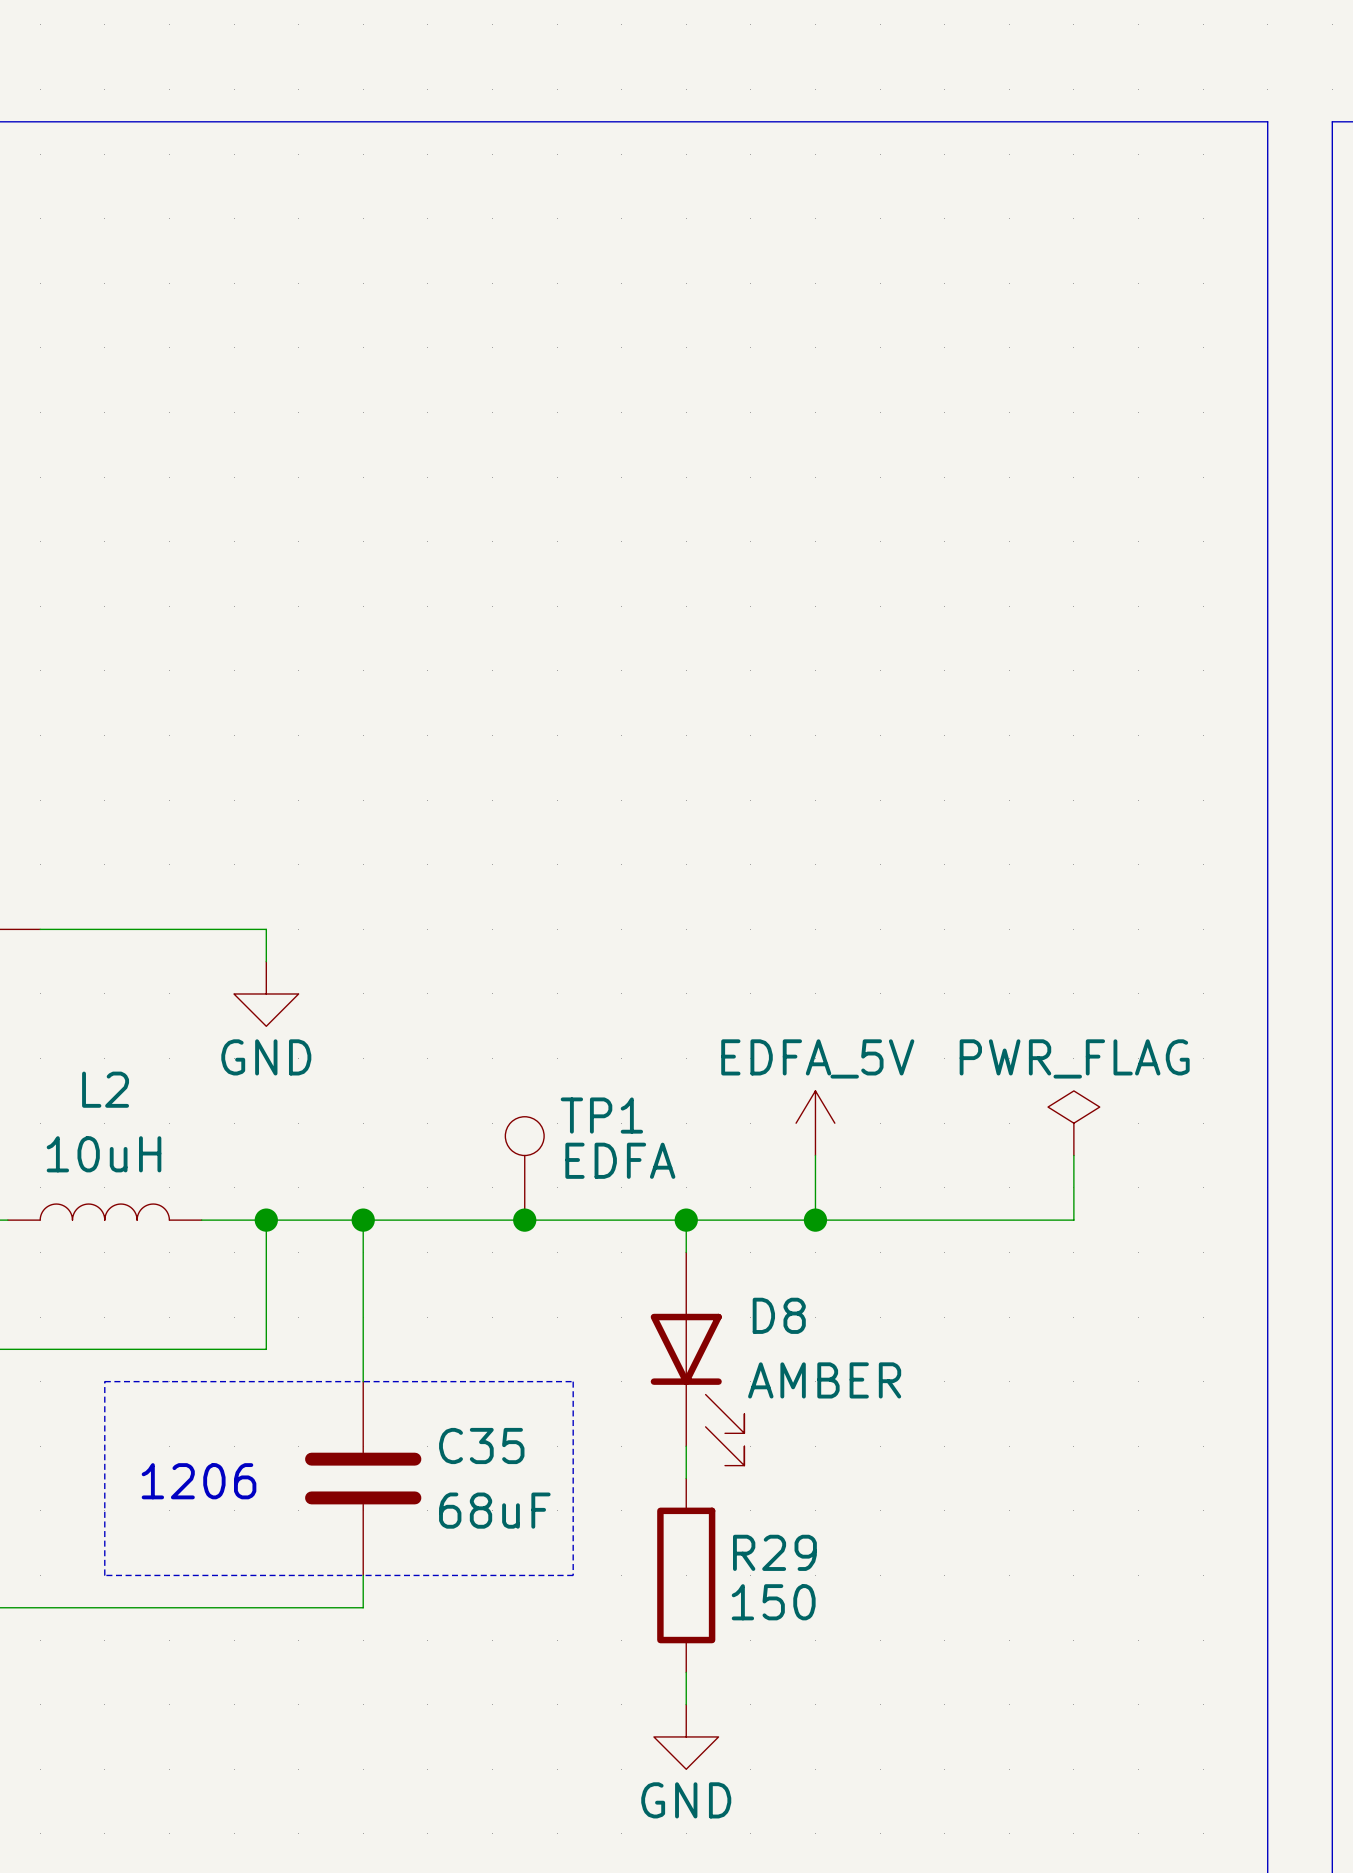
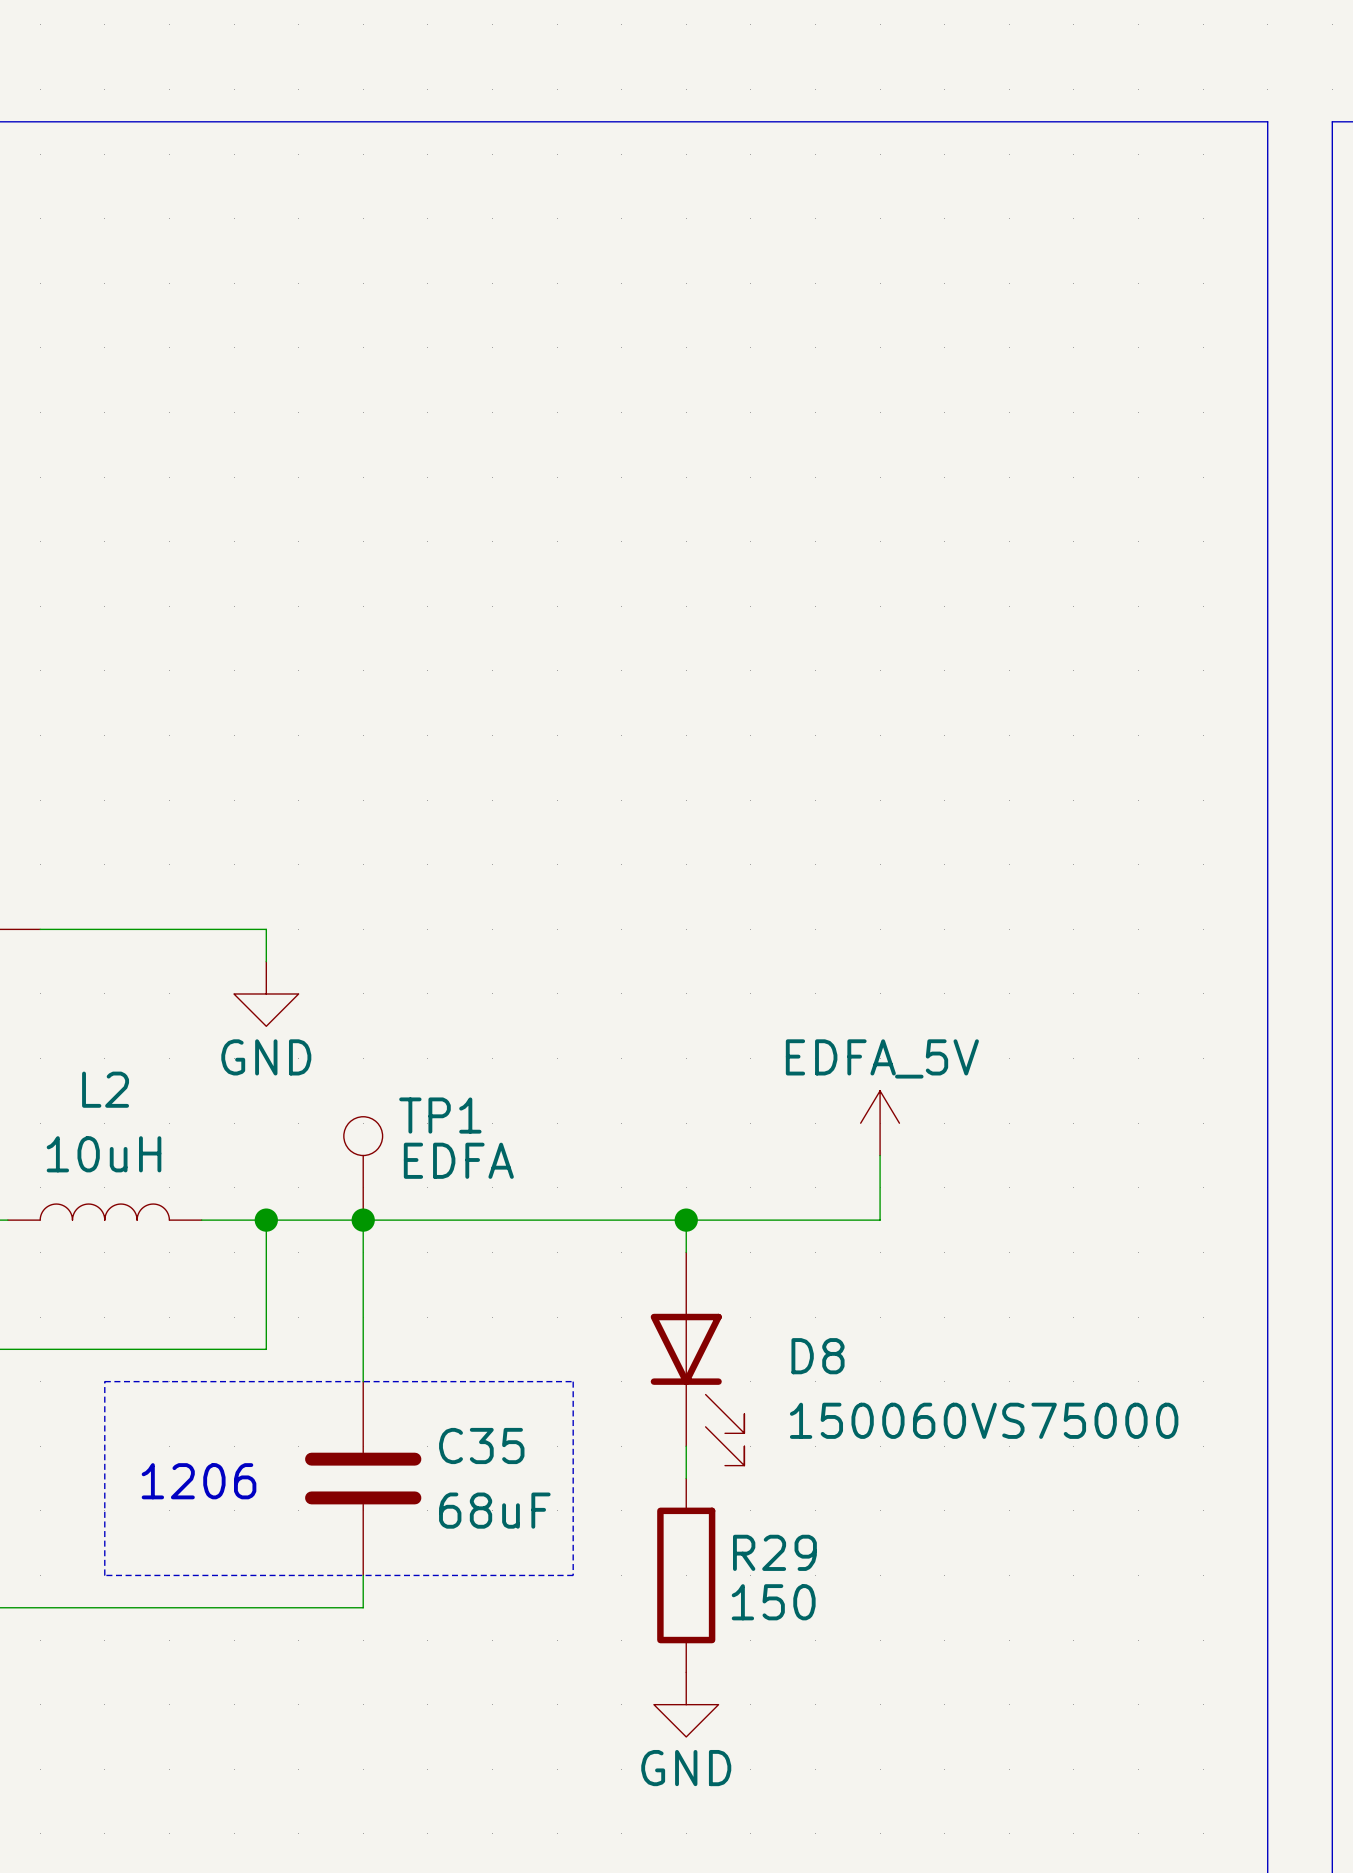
power symbol position: EDFA_5V (815, 1123) -> EDFA_5V (880, 1123)
power symbol: PWR_FLAG (1073, 1123) -> none
wire: (815, 1155) (815, 1220) -> none
wire: (1073, 1155) (1073, 1220) (880, 1220) -> (880, 1155) (880, 1220)
TP1 position: (524, 1168) -> (363, 1168)
junction: (524, 1220) -> none
junction: (815, 1220) -> none
D8 name position: D8 (779, 1315) -> D8 (818, 1356)
D8 value: AMBER (824, 1380) -> 150060VS75000 (984, 1420)
power symbol position: GND (686, 1736) -> GND (686, 1704)

